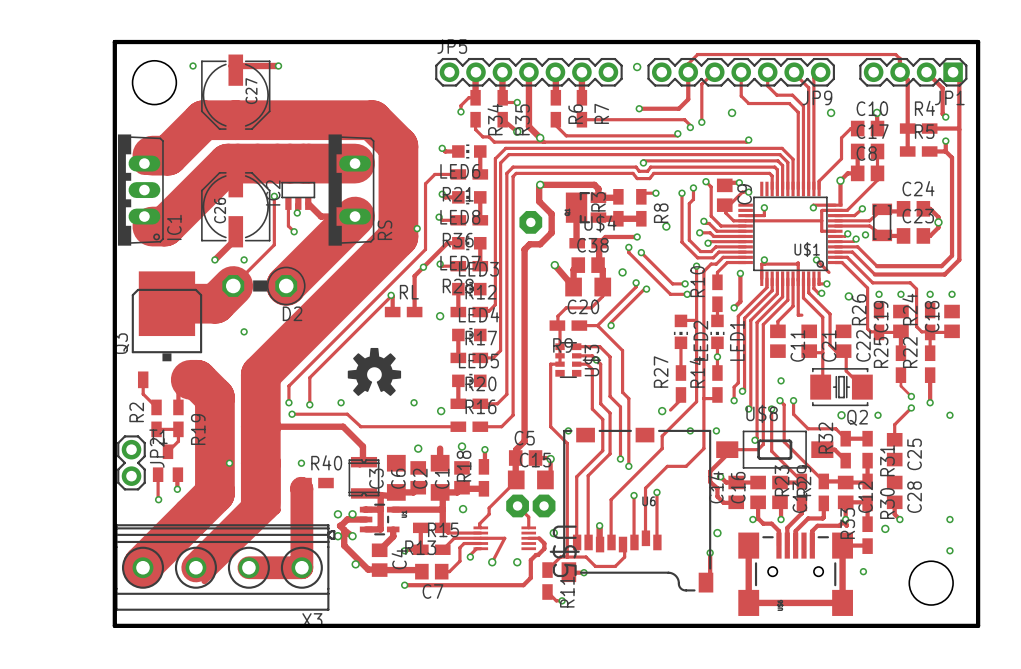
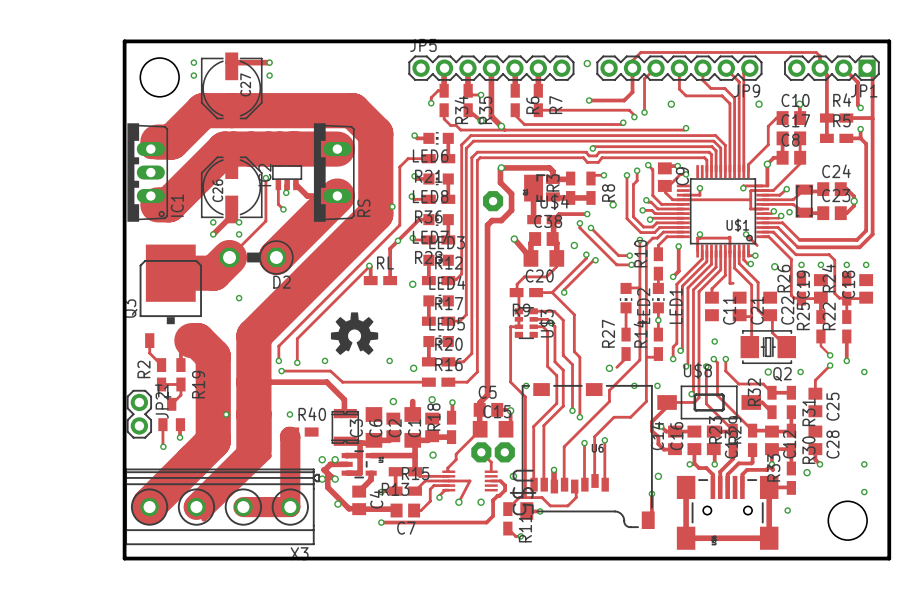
via: none -> (193, 75)
via: none -> (269, 75)
via: none -> (213, 222)
via: none -> (239, 222)

